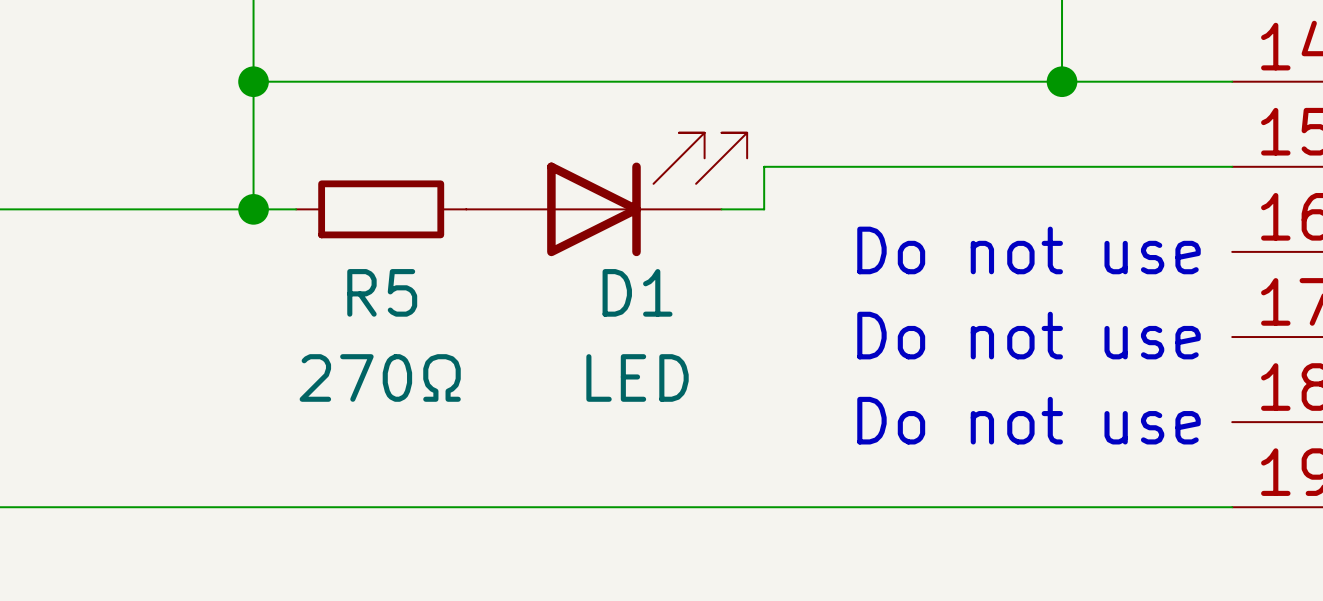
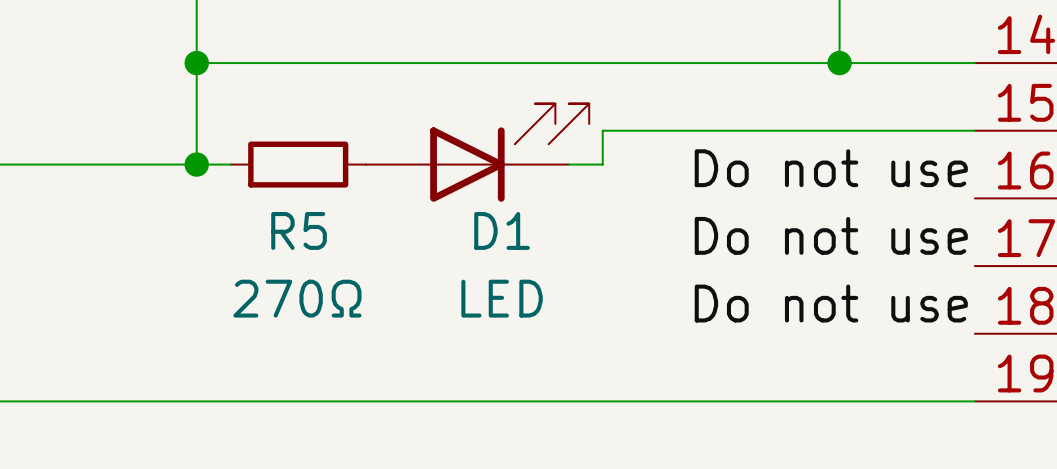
label: none -> Do not use (831, 168)
text: Do not use (1029, 250) -> none
label: none -> Do not use (831, 235)
text: Do not use (1029, 335) -> none
label: none -> Do not use (831, 303)
text: Do not use (1029, 420) -> none

